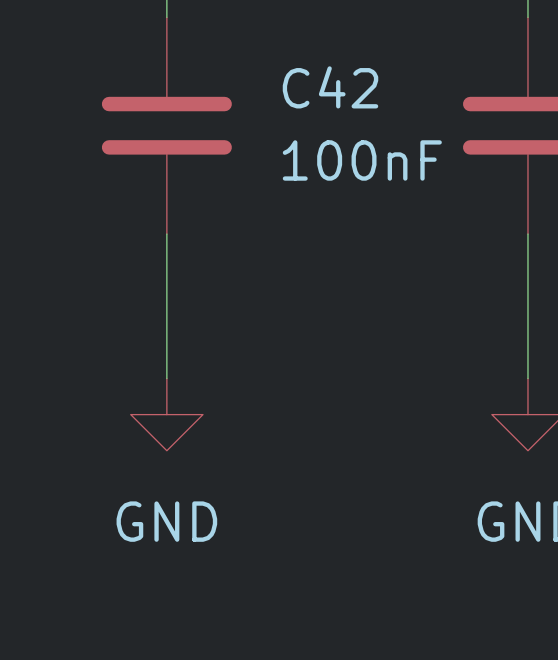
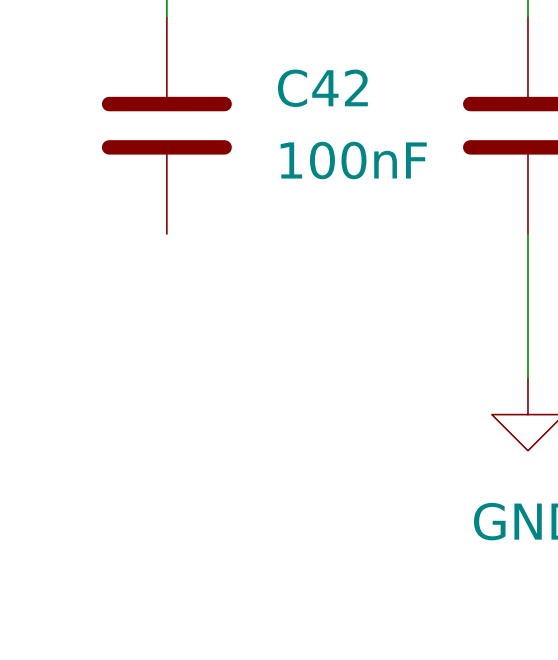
wire: (166, 234) (166, 378) -> none
power symbol: GND (166, 414) -> none

